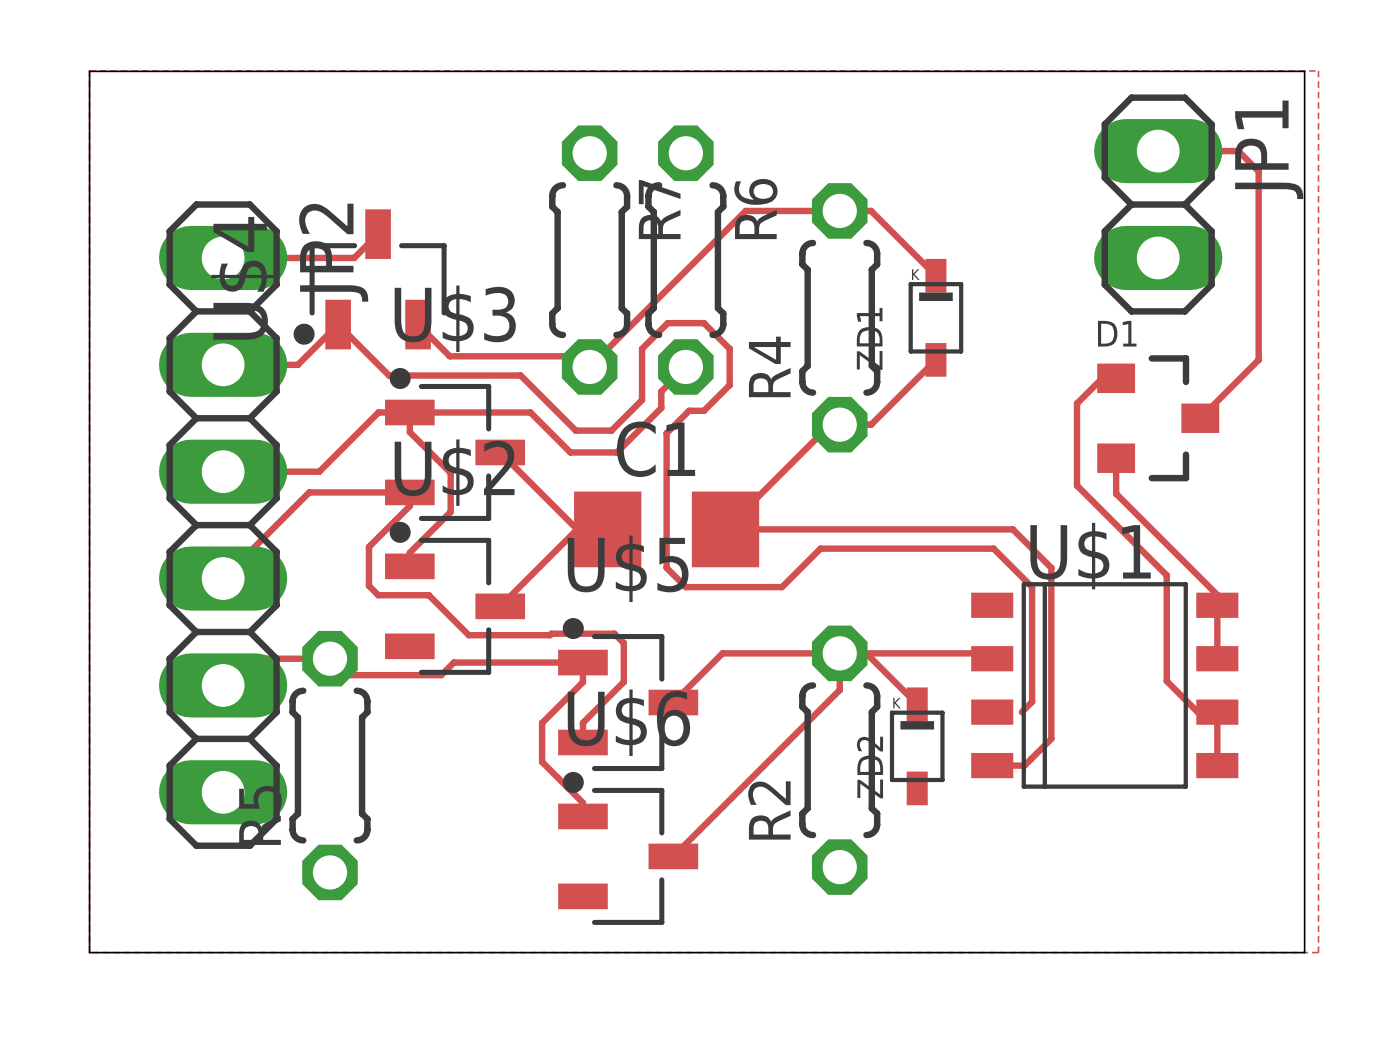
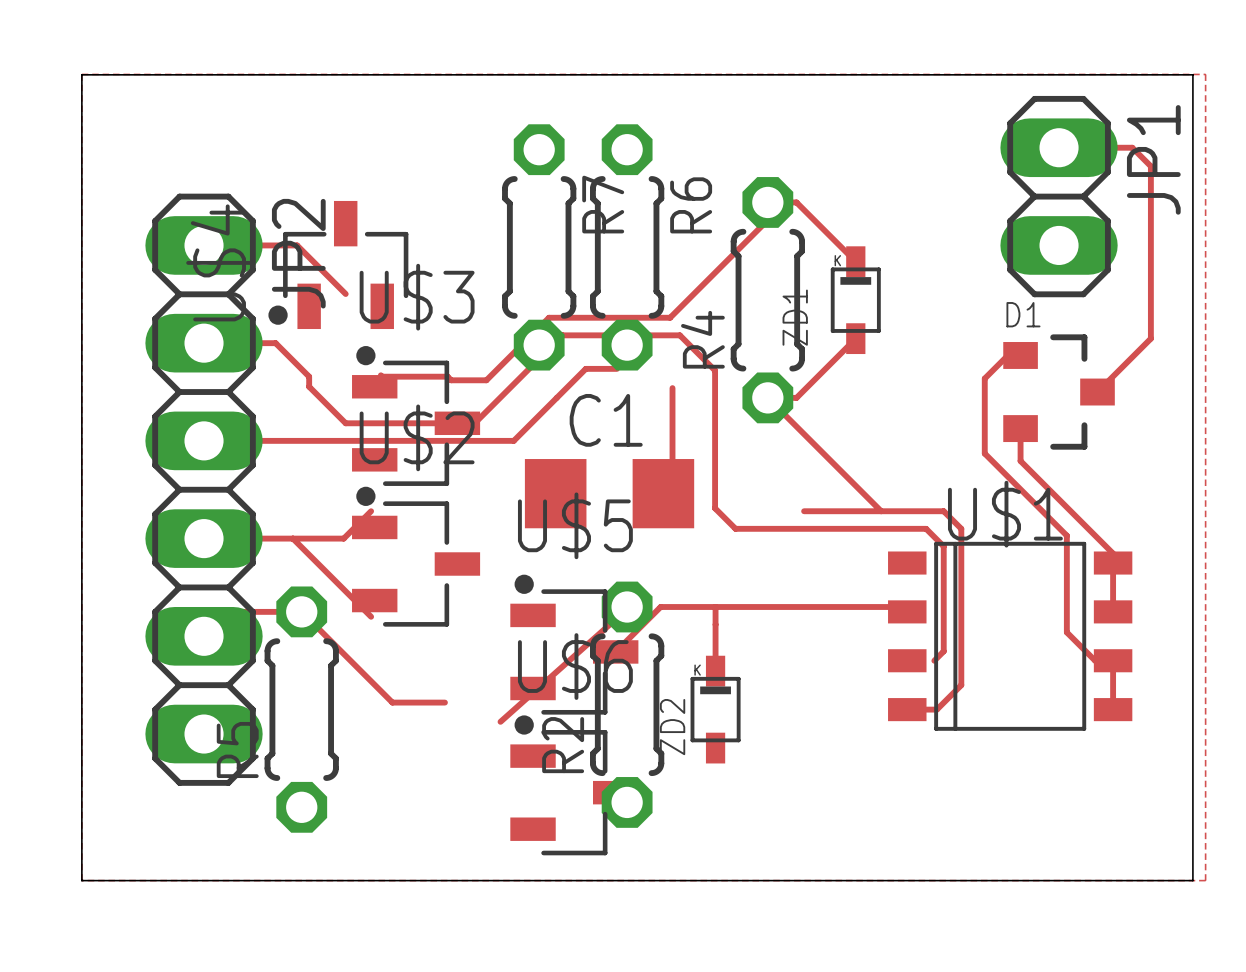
track: (839, 210) (745, 210) (589, 366) (579, 356) (449, 356) (418, 324) -> (767, 202) (767, 220) (670, 317) (548, 317) (486, 380) (451, 380) (447, 376) (380, 375)
track: (378, 234) (354, 257) (324, 257) -> (345, 294) (297, 245)
track: (297, 364) (338, 324) (389, 375) (520, 375) (575, 430) (611, 430) (642, 400) (642, 348) (667, 323) (704, 323) (729, 348) (729, 385) (704, 410) (689, 410) (666, 433) (666, 567) (685, 587) (782, 587) (820, 548) (879, 548) -> (272, 343) (275, 343) (309, 376) (309, 386) (345, 423) (474, 423) (562, 335) (679, 335) (715, 370) (715, 508) (735, 528) (926, 528)
track: (685, 366) (661, 391) (661, 408) (616, 452) (570, 452) (530, 412) (378, 412) (319, 471) -> (616, 368) (585, 368) (513, 440) (291, 440)
track: (409, 412) (409, 432) (450, 472) (450, 511) (409, 552) (409, 566) -> none
track: none -> (672, 388) (672, 475)
track: (839, 424) (830, 424) (725, 529) (1012, 529) (1032, 548) -> (767, 397) (881, 511)
track: (500, 452) (577, 529) -> none
track: (577, 529) (500, 606) -> none
track: none -> (371, 511) (343, 538) (204, 538)
track: (993, 548) (1012, 567) -> (908, 511) (943, 511)
track: none -> (292, 538) (371, 616)
track: (223, 585) (223, 578) (309, 492) (409, 492) (409, 506) (368, 546) (368, 585) (378, 595) (428, 595) (468, 635) (614, 633) (623, 643) (623, 682) (582, 722) (582, 742) -> none
track: none -> (629, 607) (500, 721)
track: none -> (715, 607) (715, 671)
track: (839, 653) (839, 690) (673, 856) -> none
track: (866, 653) (917, 704) -> none
track: (346, 675) (441, 675) (453, 662) (582, 662) (582, 682) (542, 723) (542, 761) (582, 802) (582, 816) -> (316, 626) (392, 702) (444, 702)
ZD2 position: (917, 746) -> (715, 709)
R2 position: (839, 760) -> (627, 704)

